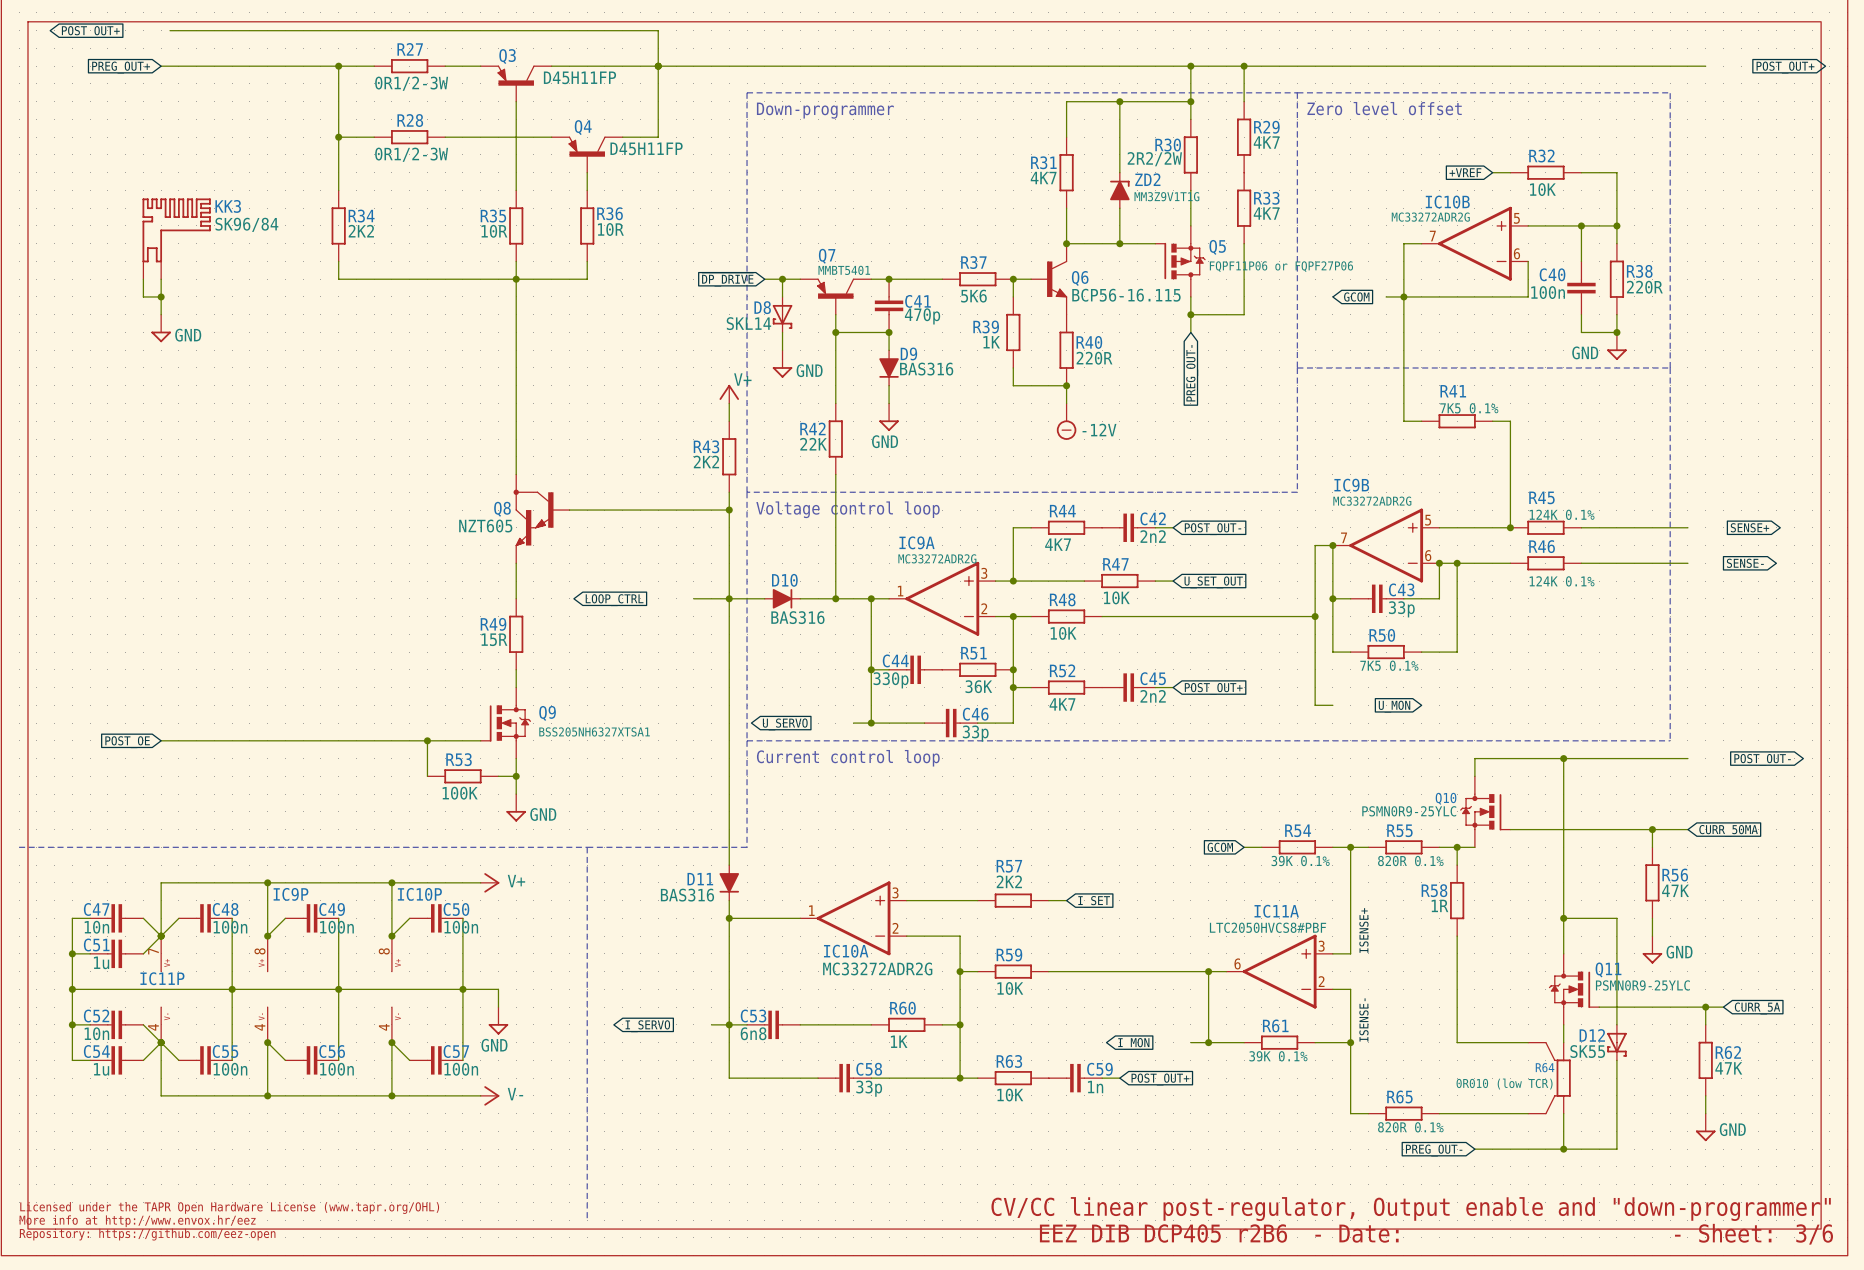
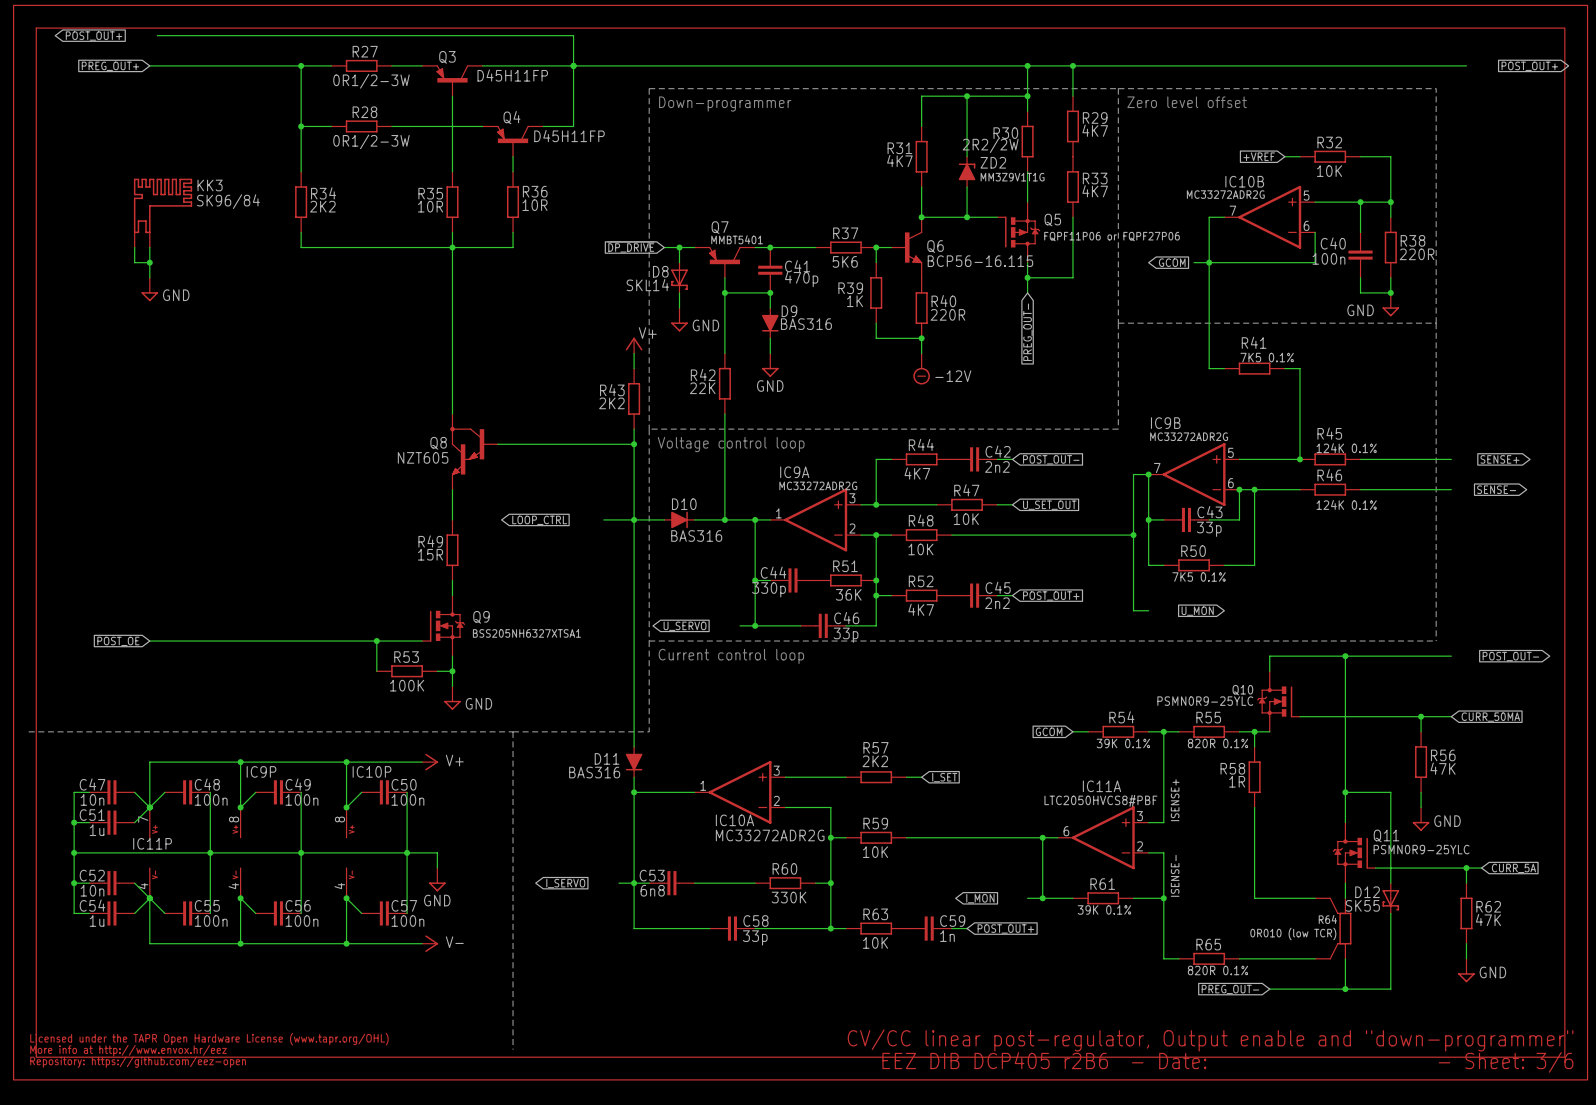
R60 value: 1K (899, 1041) -> 330K (789, 897)

